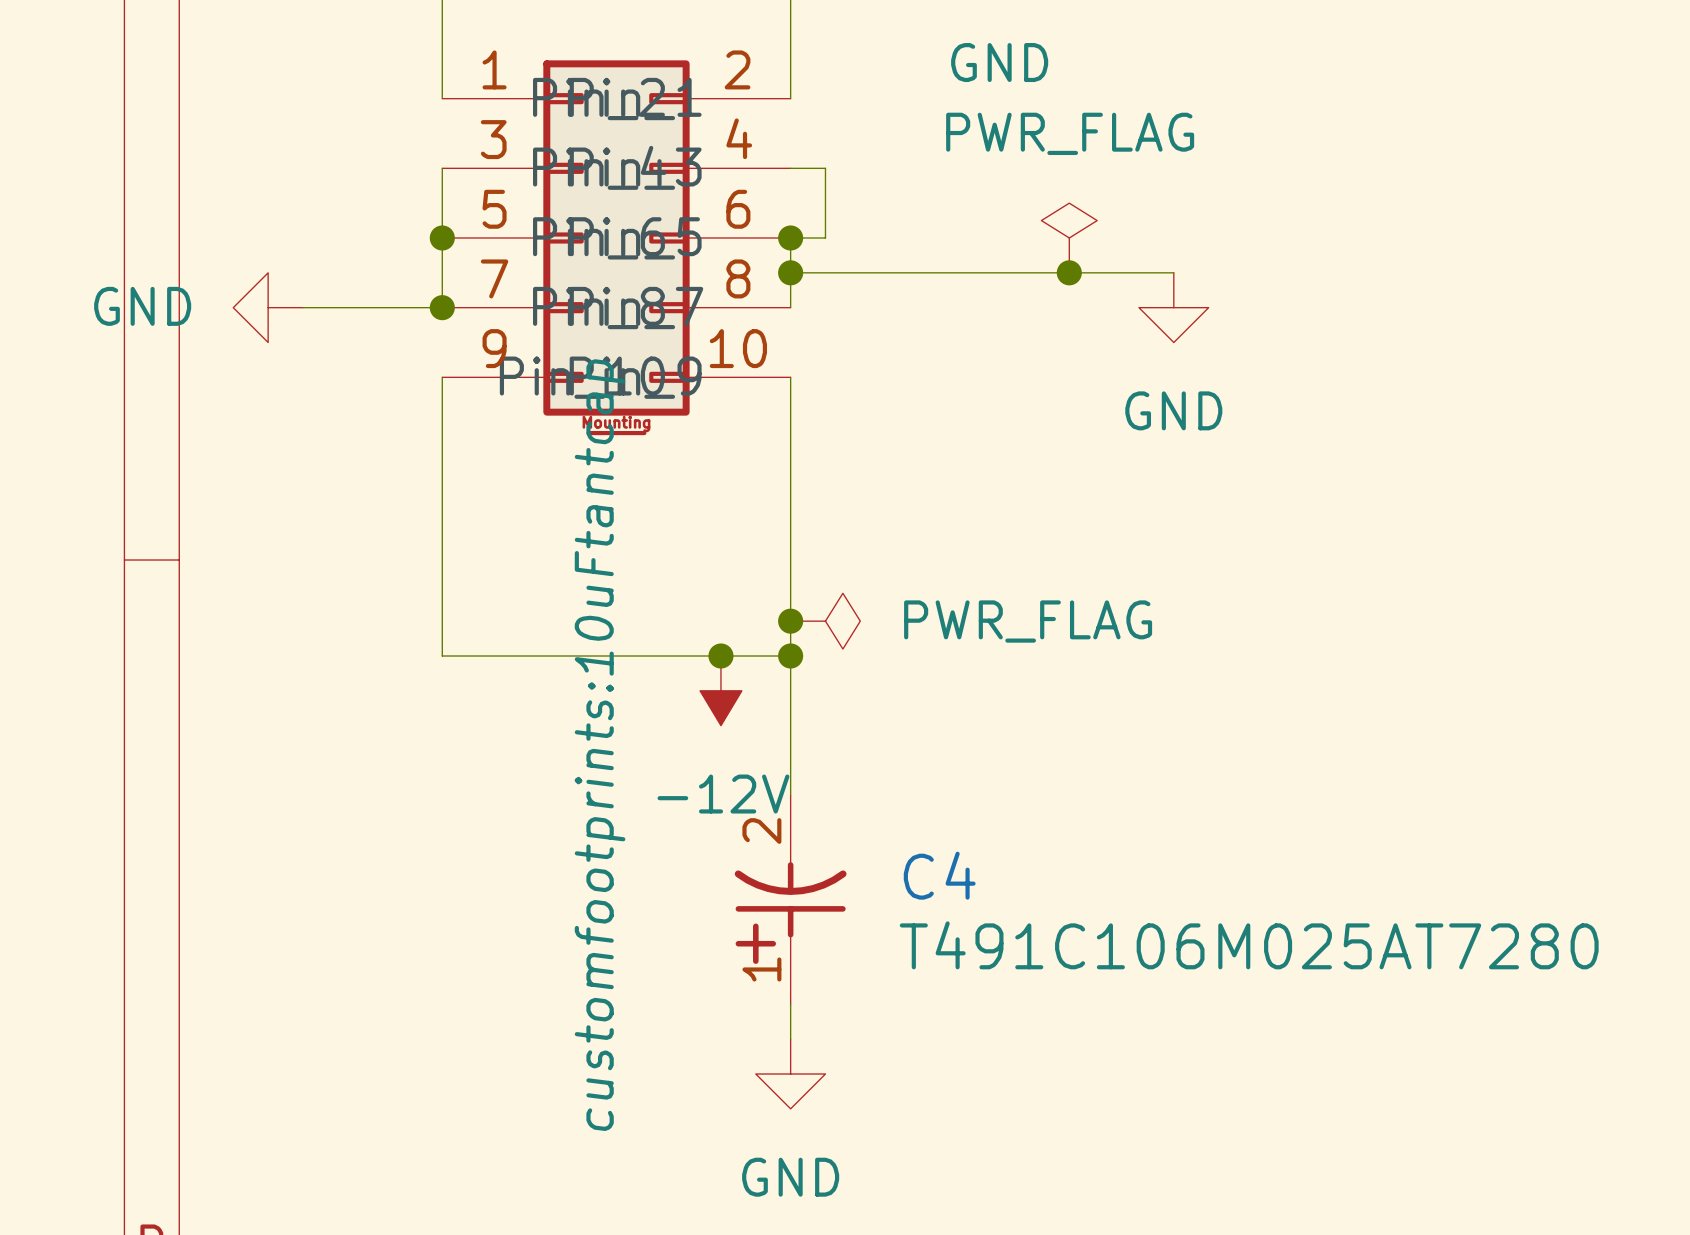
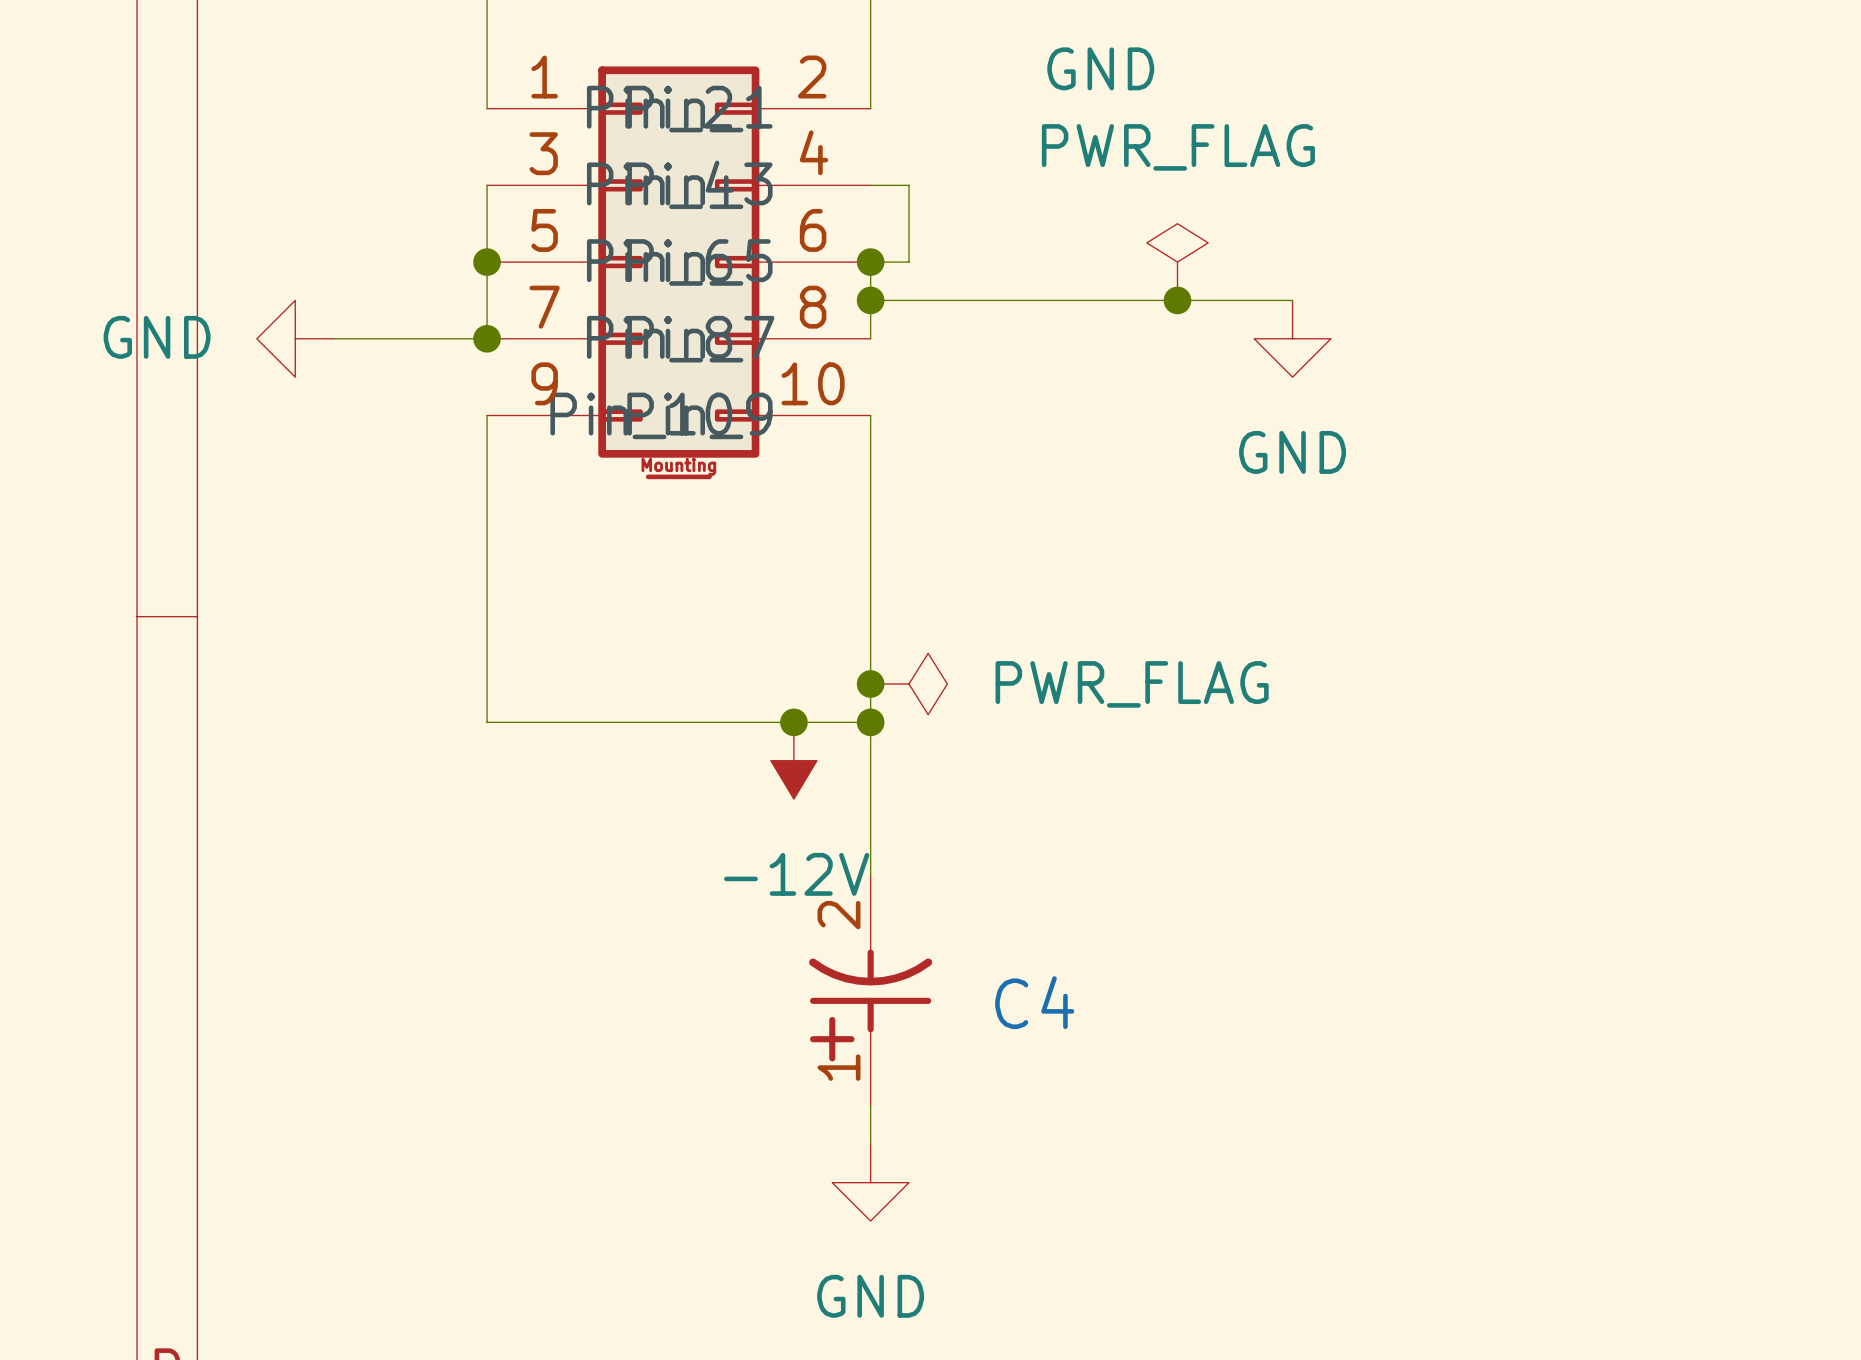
C4 text: customfootprints:10uFtantcap (600, 745) -> none
C4 name position: C4 (939, 875) -> C4 (1034, 1002)
C4 value: T491C106M025AT7280 (1249, 945) -> none

